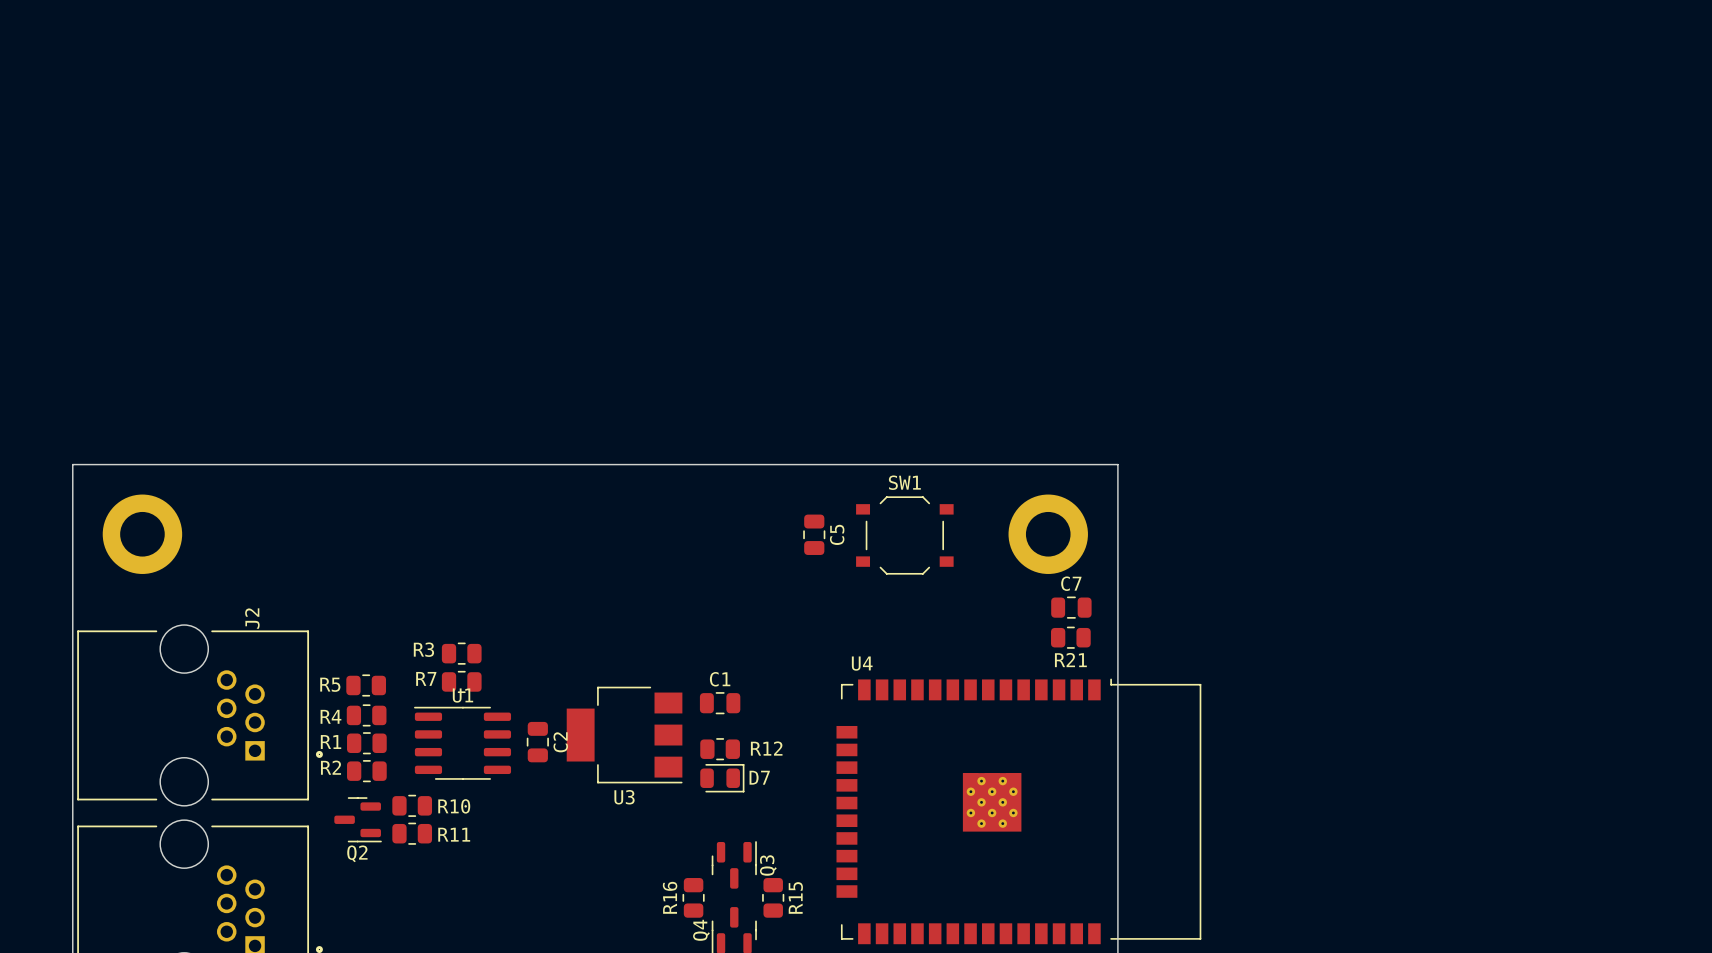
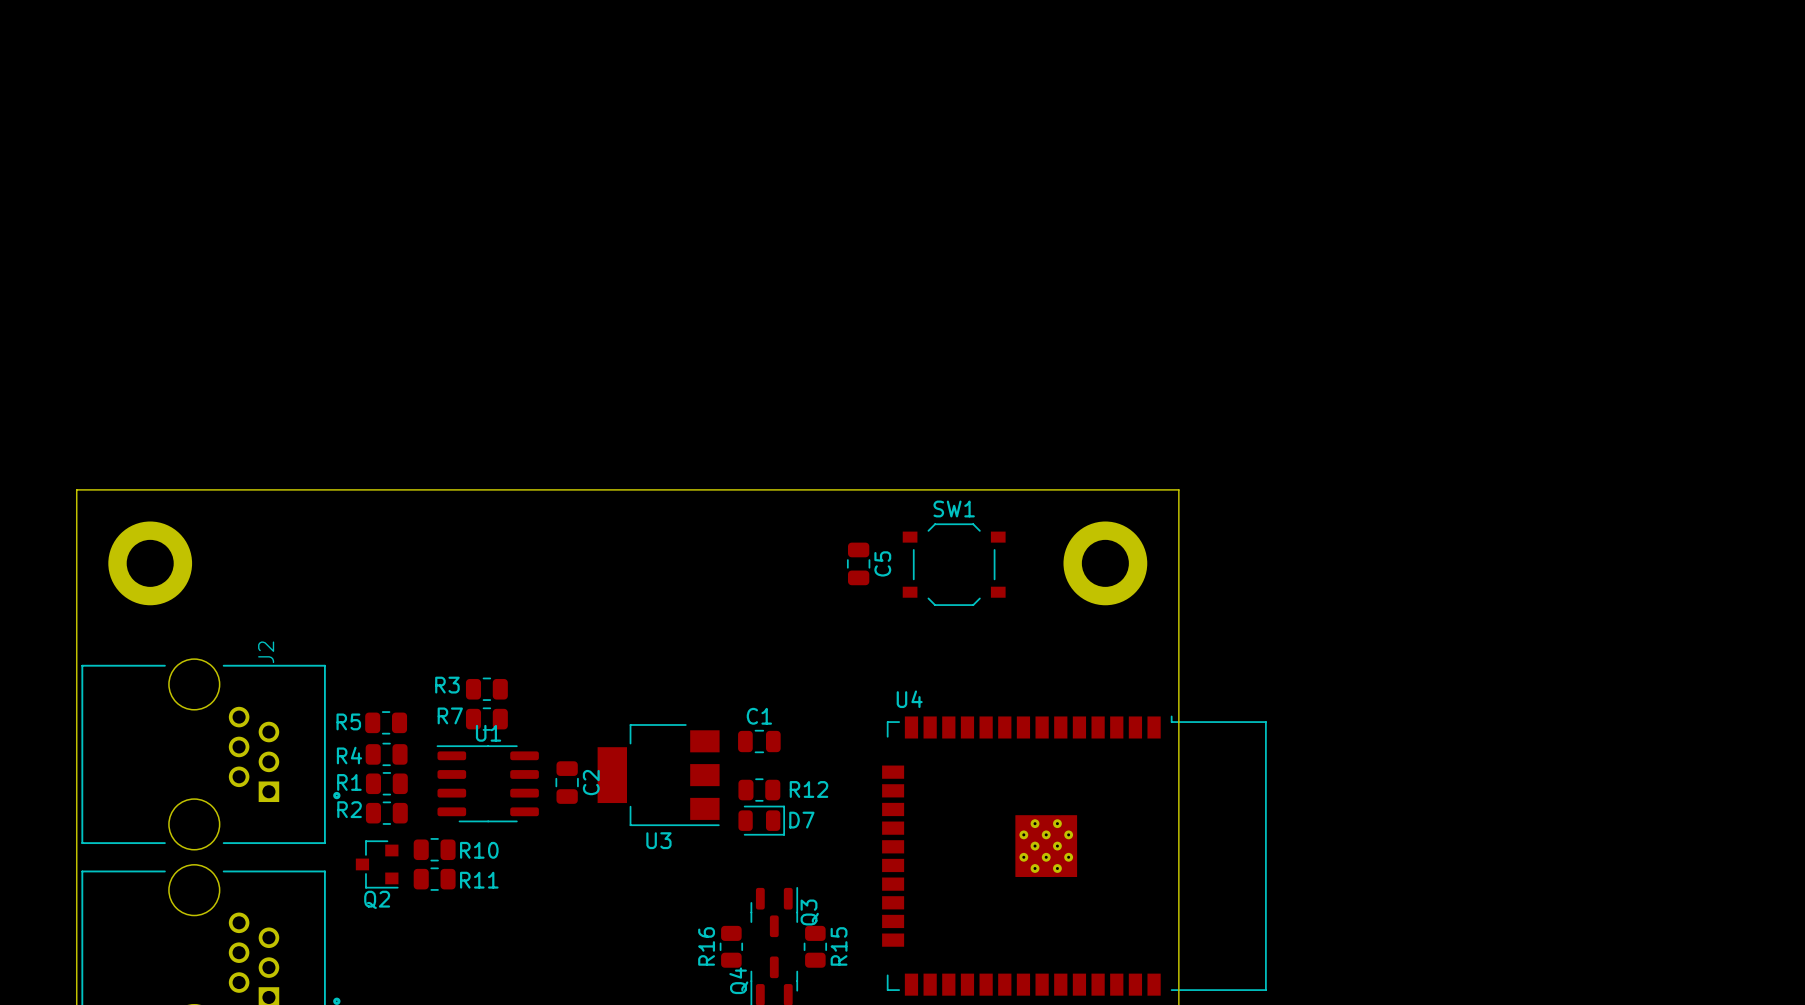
C7: (1071, 607) -> none
R21: (1070, 637) -> none
Q2 footprint: [334, 797, 382, 843] -> [355, 840, 399, 889]

